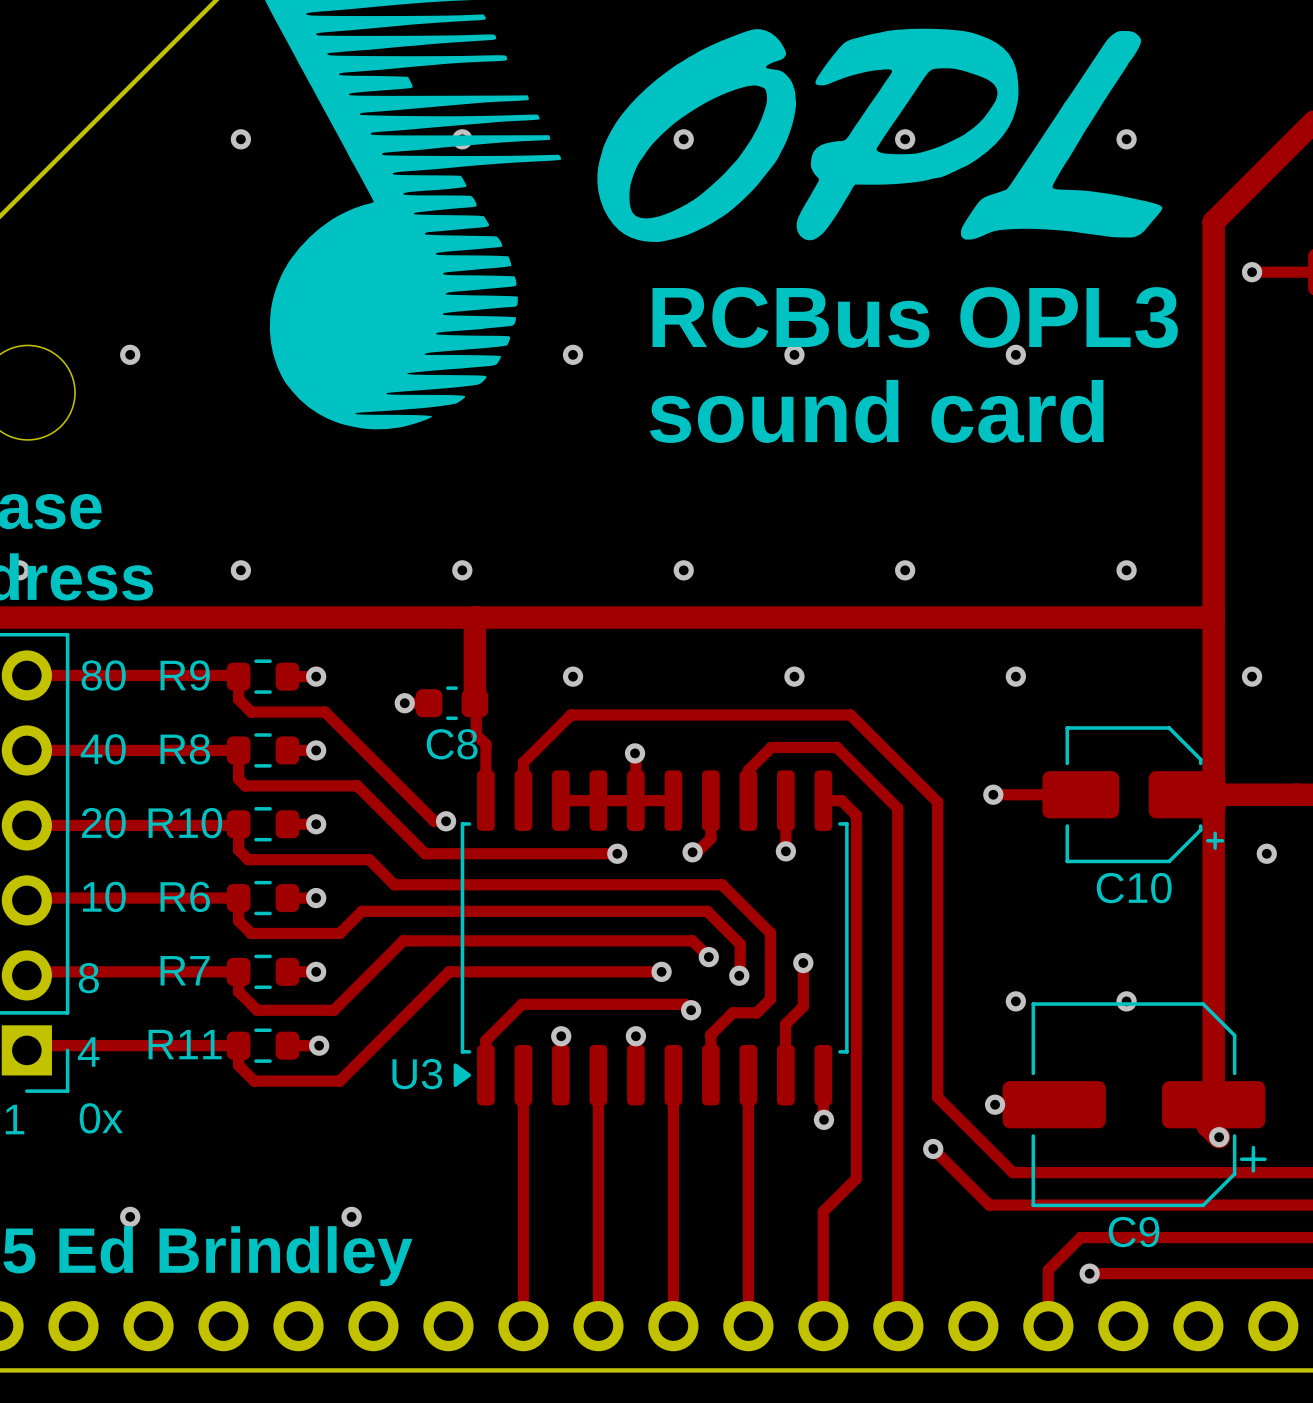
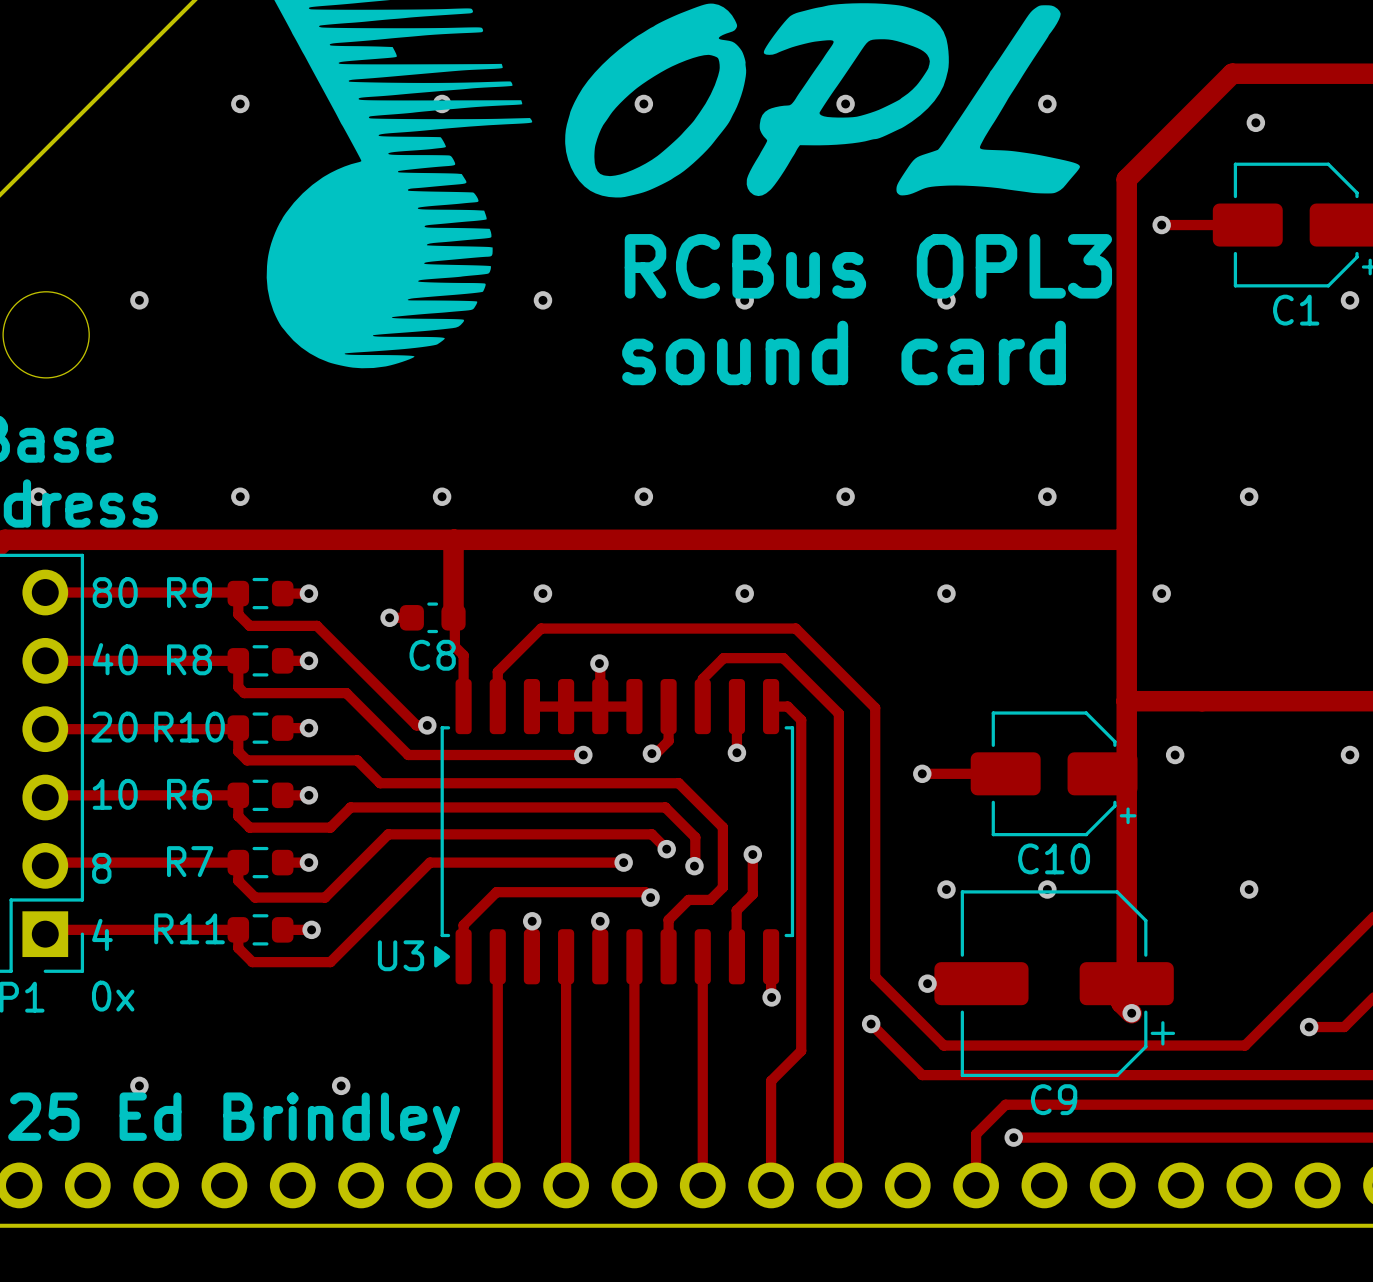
track: (993, 794) (1054, 794) -> none
via position: (993, 794) -> (922, 773)
C10 position: (1133, 794) -> (1054, 773)
track: none -> (922, 773) (1005, 773)

